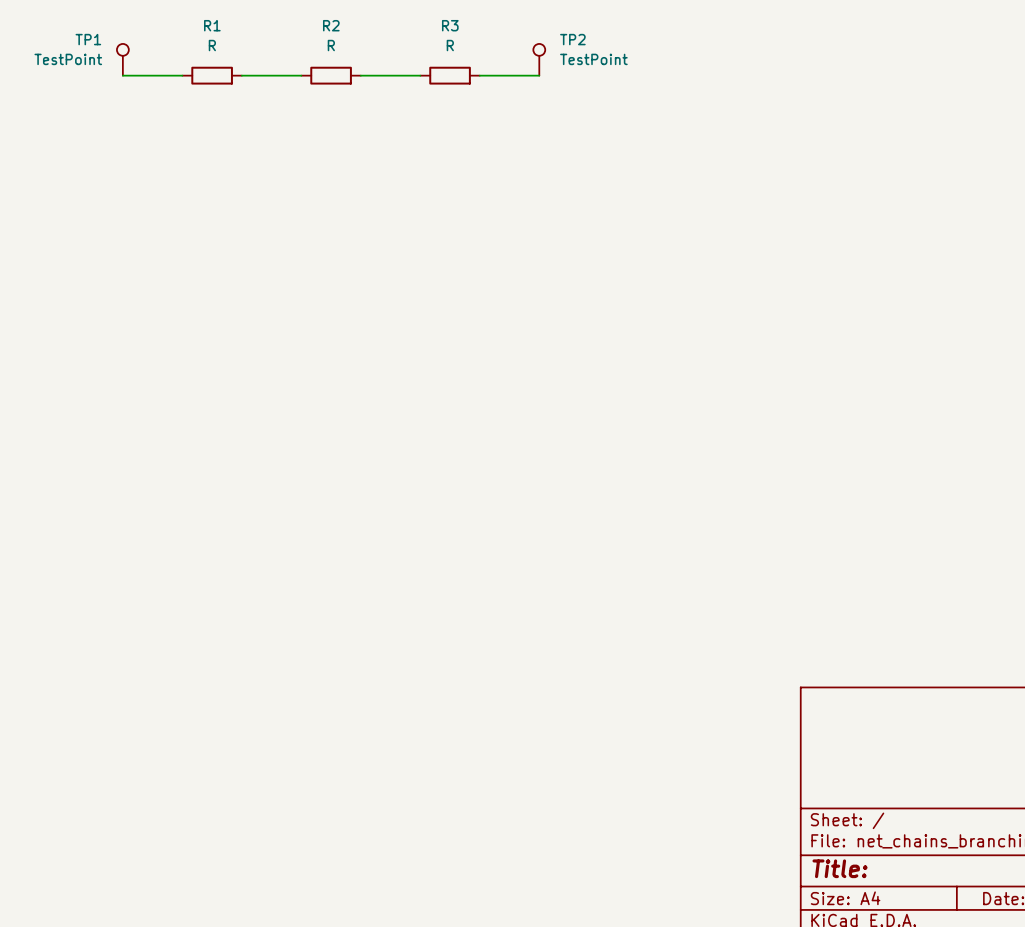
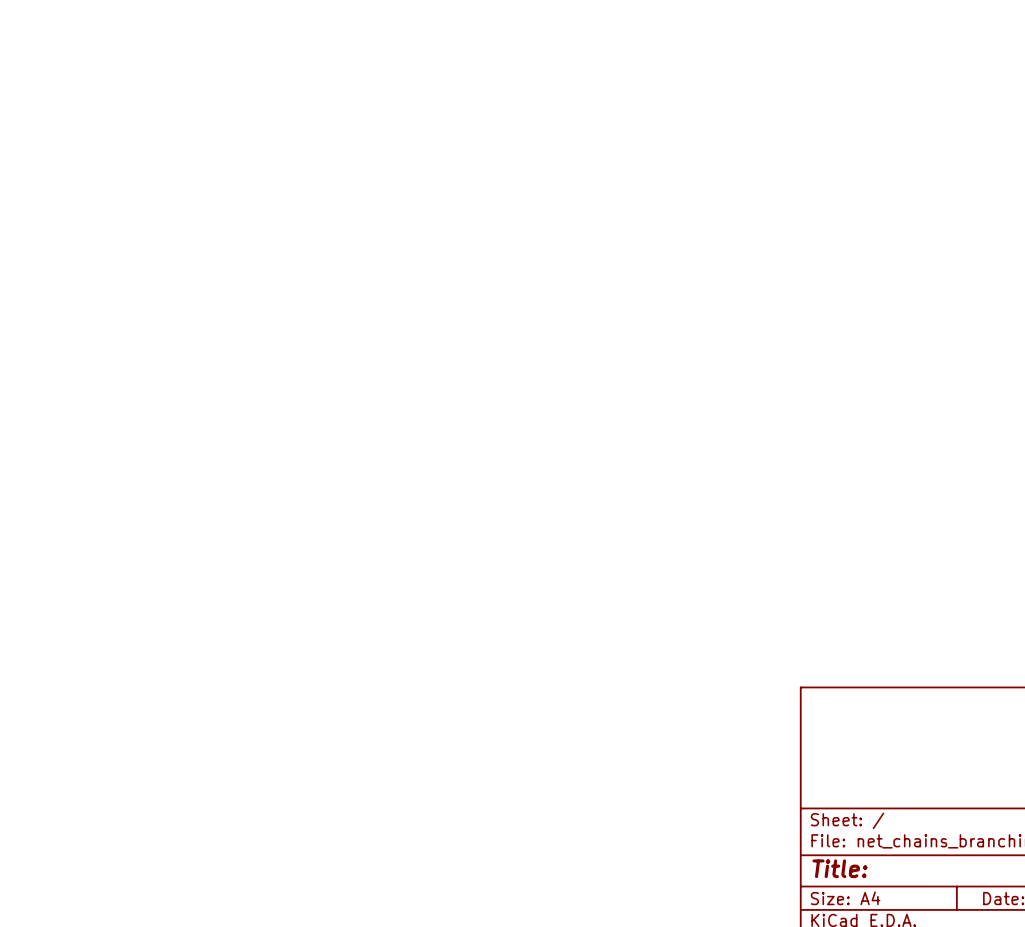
TP1: TestPoint (122, 59) -> none
TP2: TestPoint (539, 59) -> none
wire: (122, 75) (182, 75) -> none
R1: R (212, 75) -> none
wire: (241, 75) (301, 75) -> none
R2: R (331, 75) -> none
wire: (360, 75) (420, 75) -> none
R3: R (450, 75) -> none
wire: (479, 75) (539, 75) -> none

